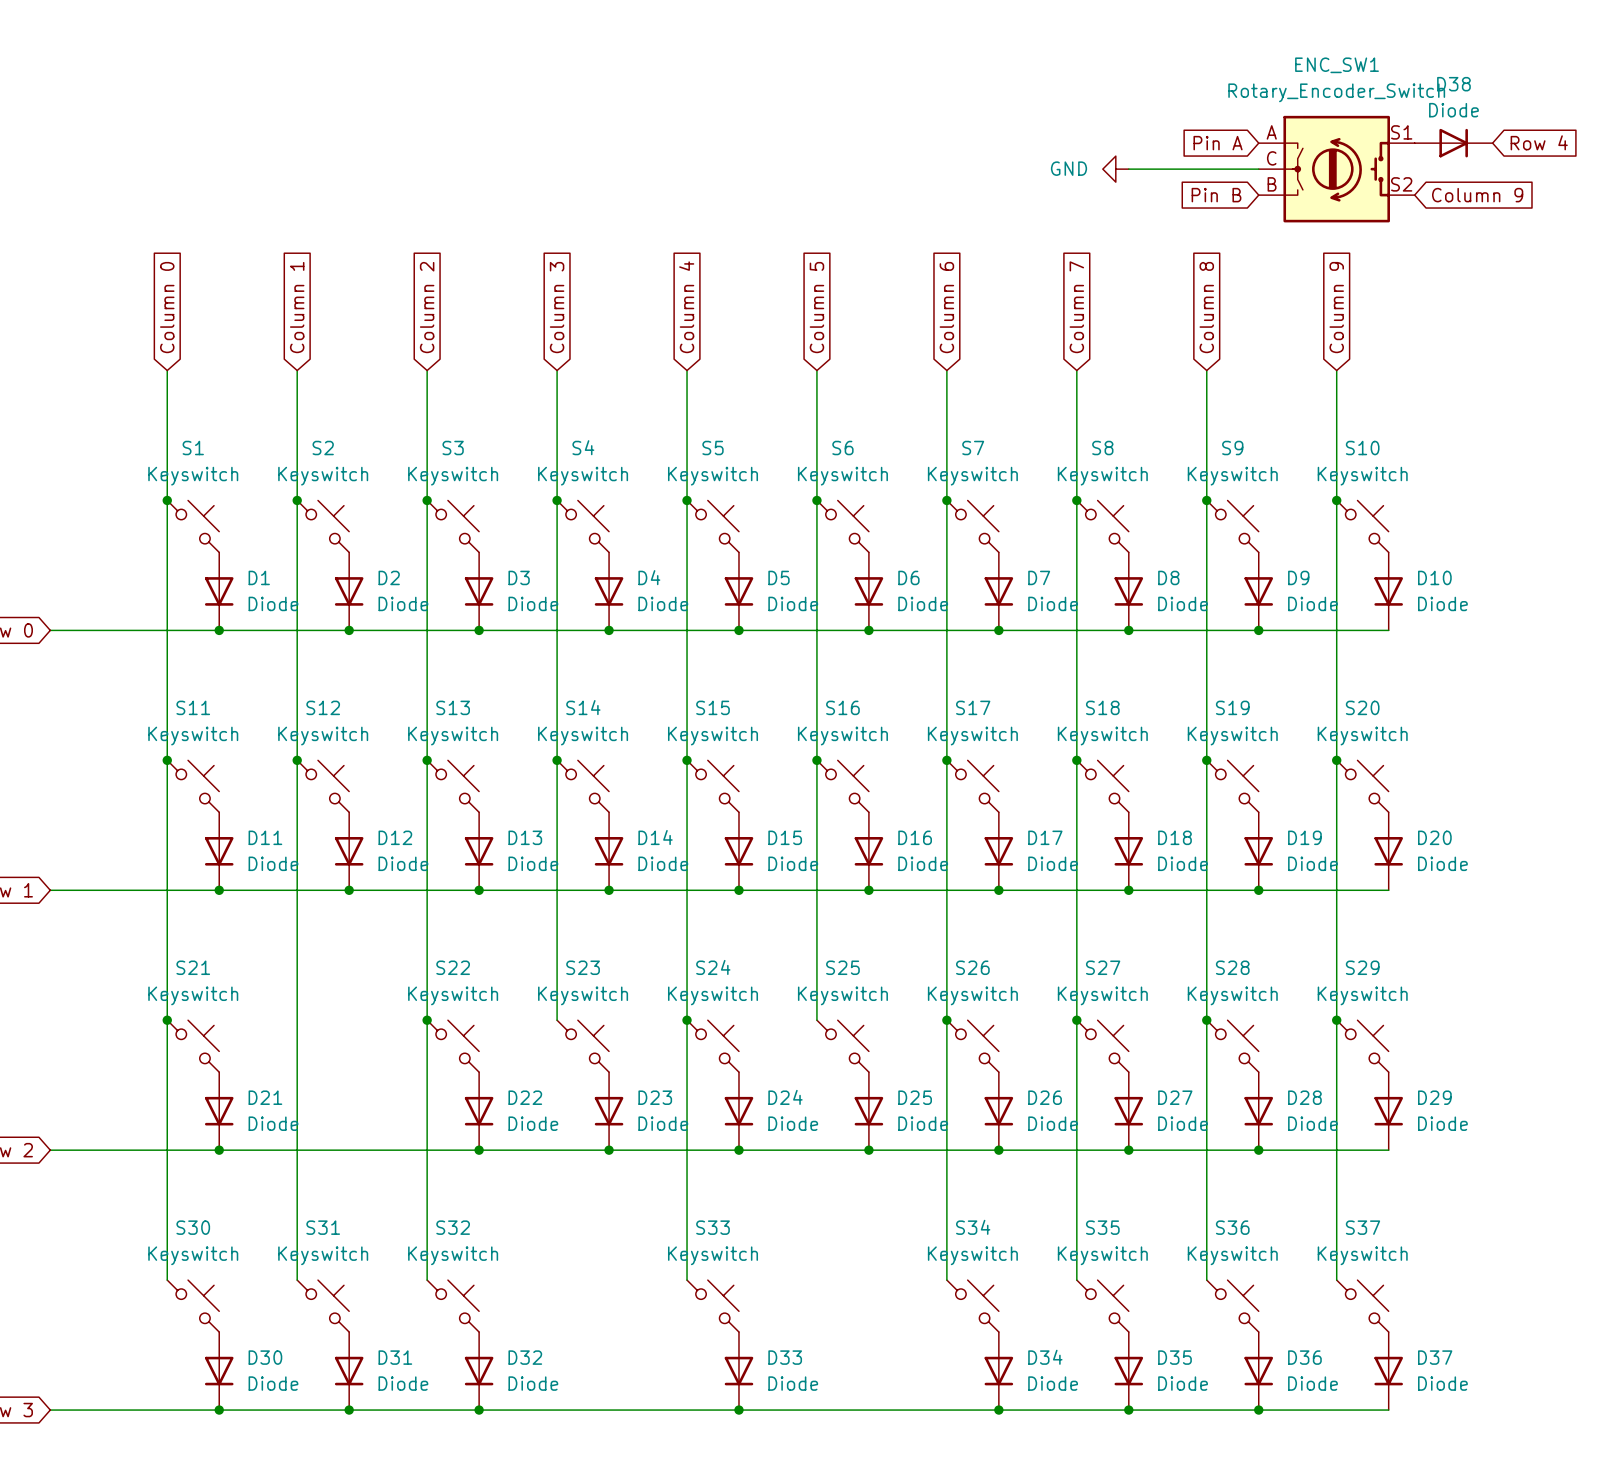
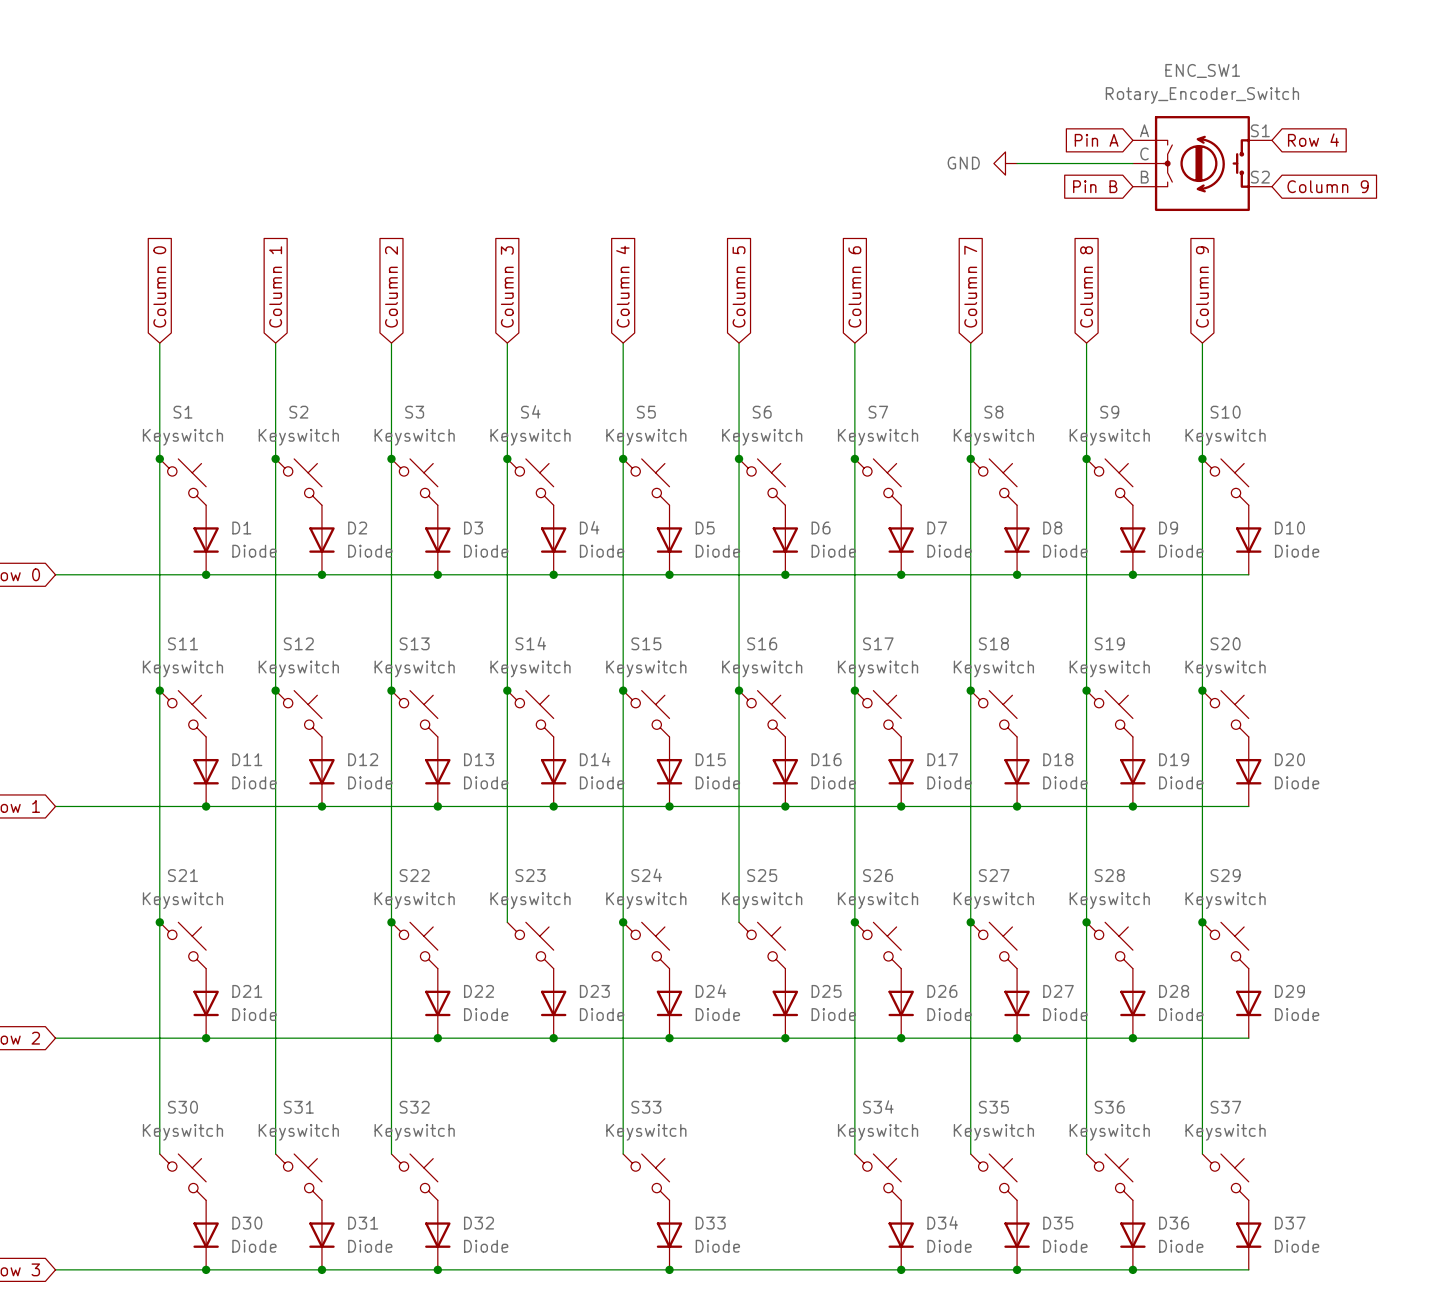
global label position: Row 4 (1539, 142) -> Row 4 (1313, 140)
D38: Diode (1453, 143) -> none

